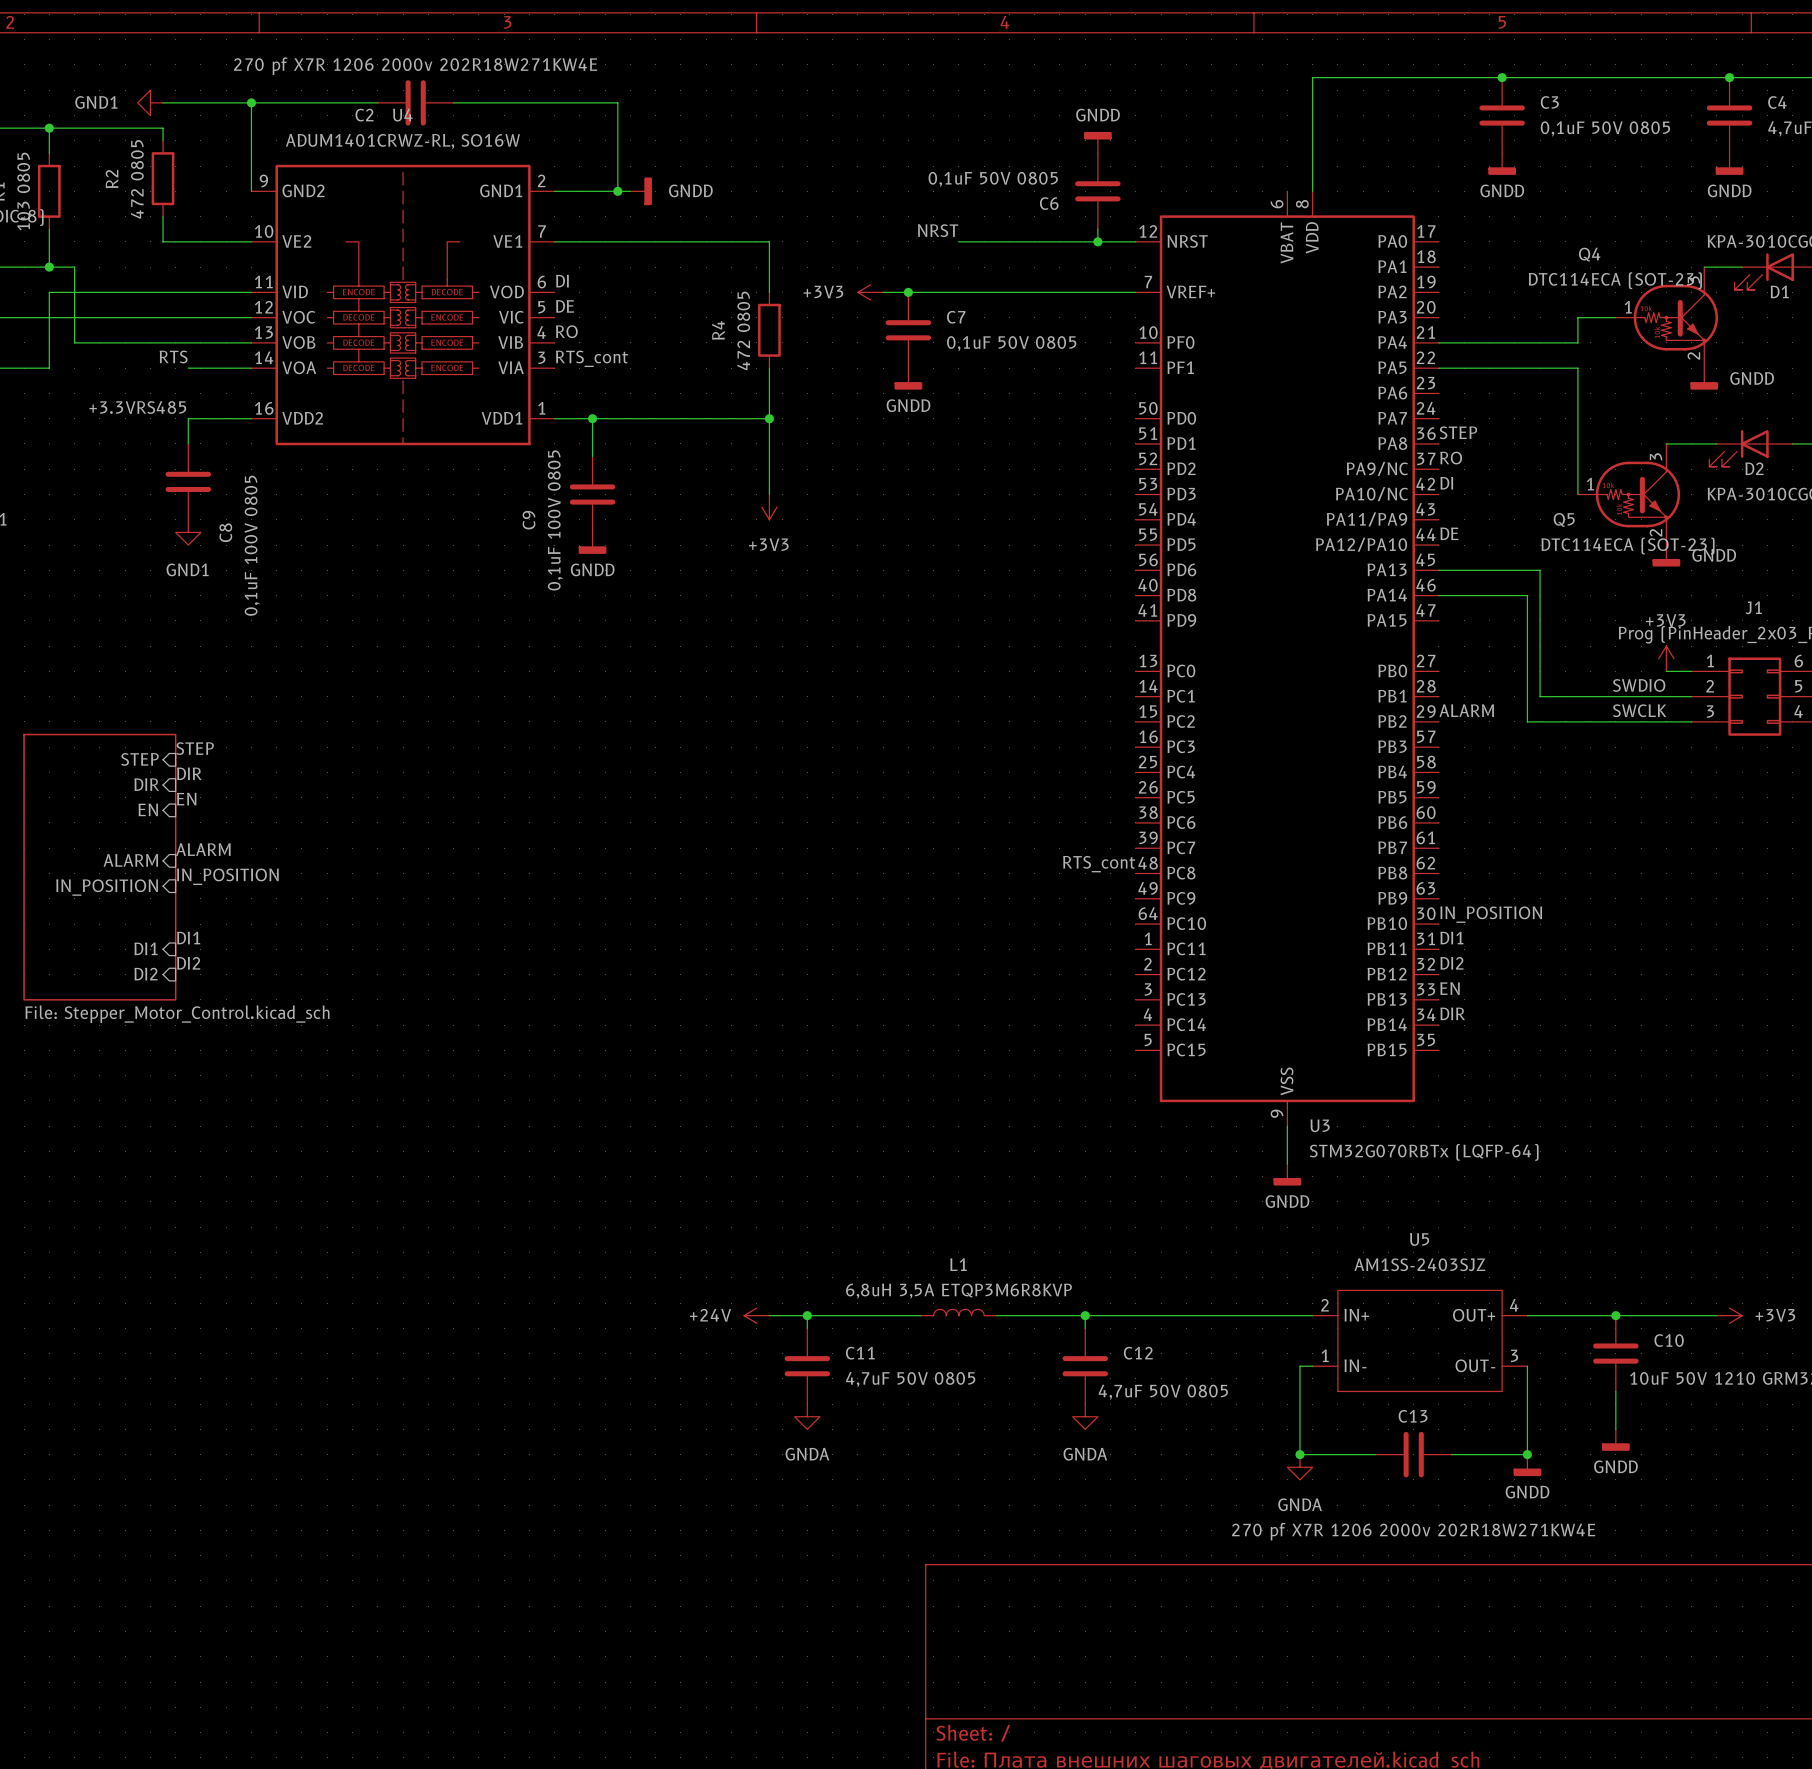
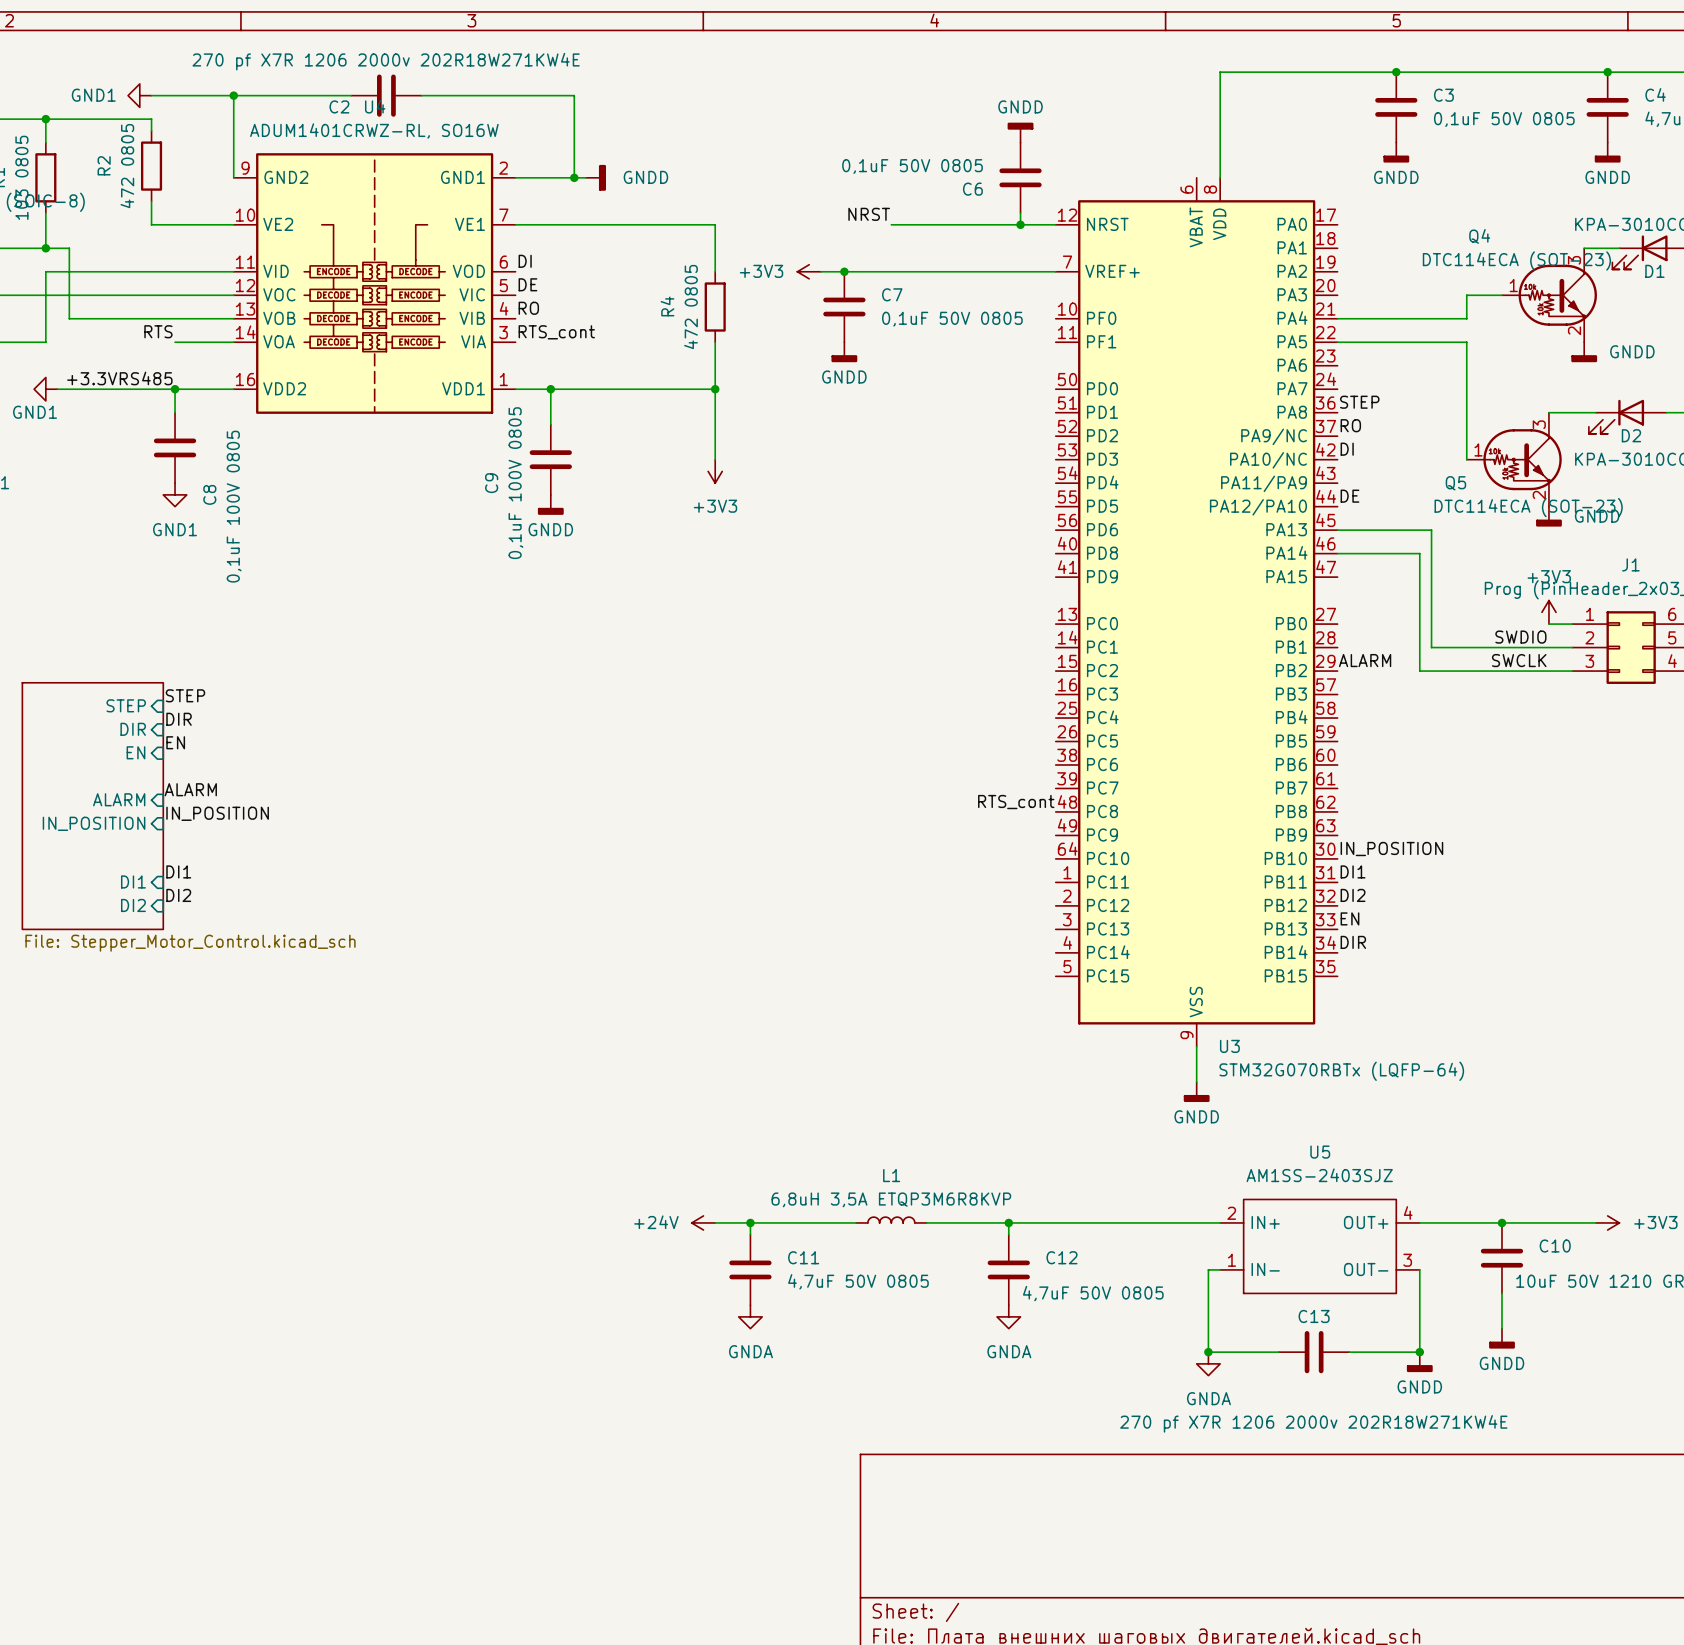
power symbol: none -> GND1 (45, 389)
wire: none -> (57, 389) (175, 389)
junction: none -> (175, 389)

